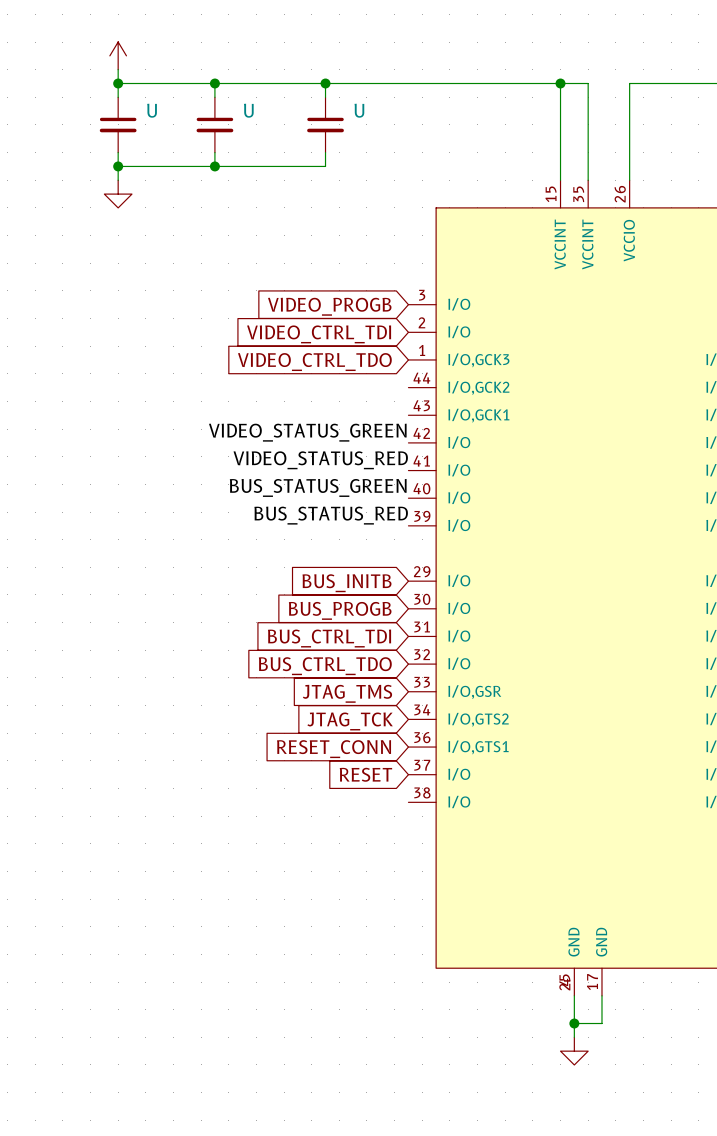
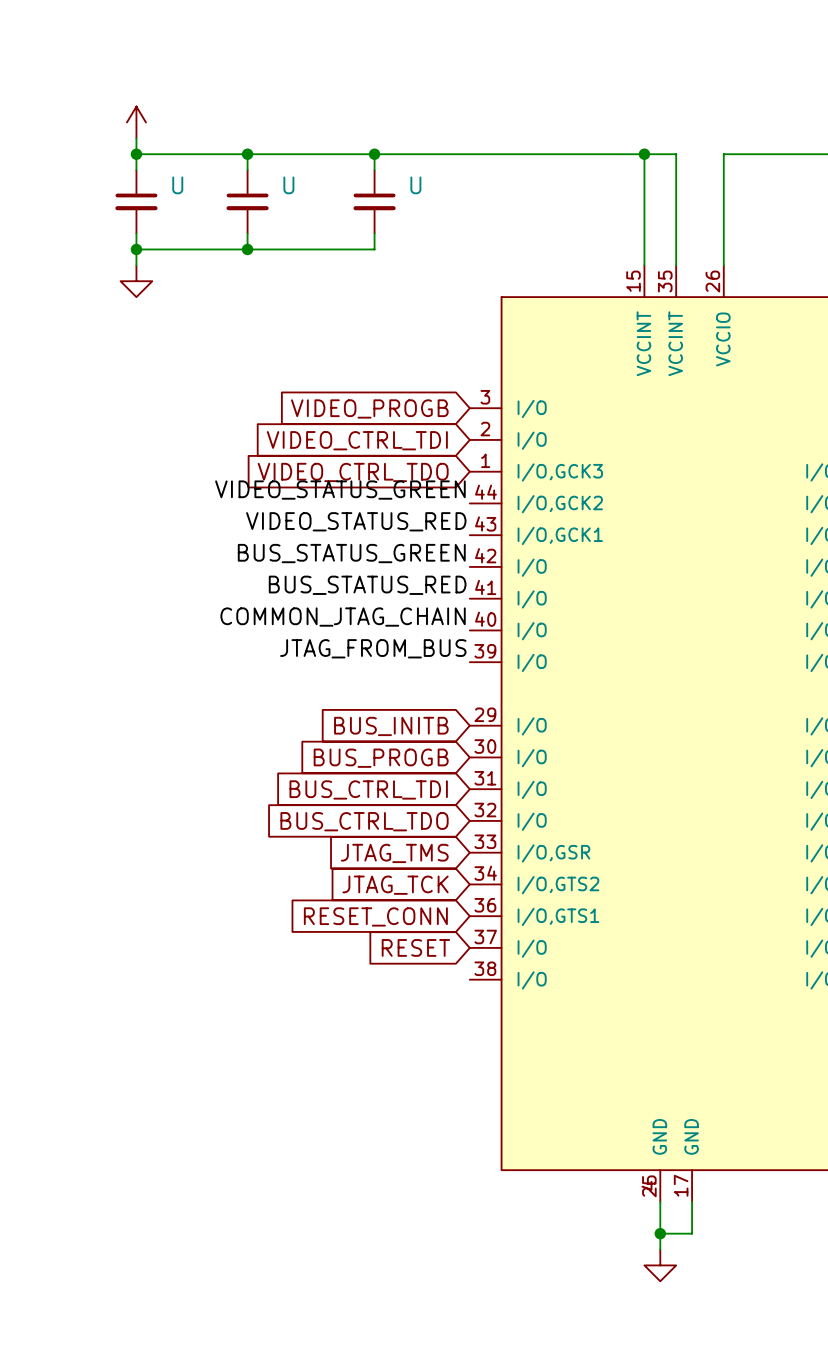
label: none -> VIDEO_STATUS_GREEN (340, 490)
label: none -> VIDEO_STATUS_RED (356, 521)
label: VIDEO_STATUS_GREEN (307, 432) -> BUS_STATUS_GREEN (351, 553)
label: VIDEO_STATUS_RED (320, 460) -> BUS_STATUS_RED (367, 585)
label: BUS_STATUS_GREEN (318, 487) -> COMMON_JTAG_CHAIN (343, 617)
label: BUS_STATUS_RED (331, 515) -> JTAG_FROM_BUS (373, 648)

